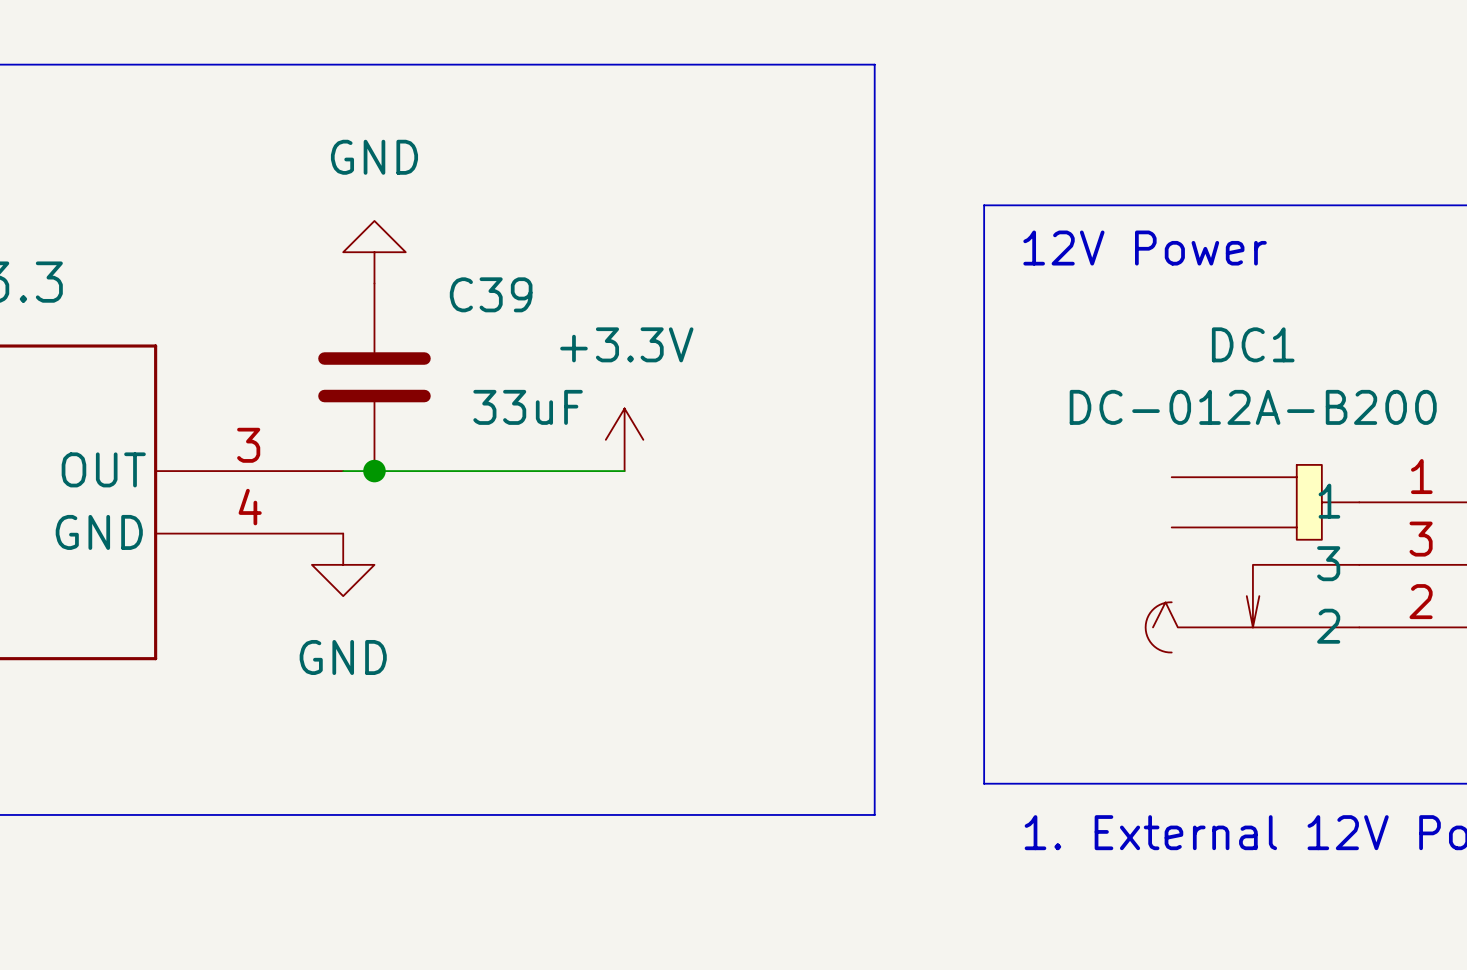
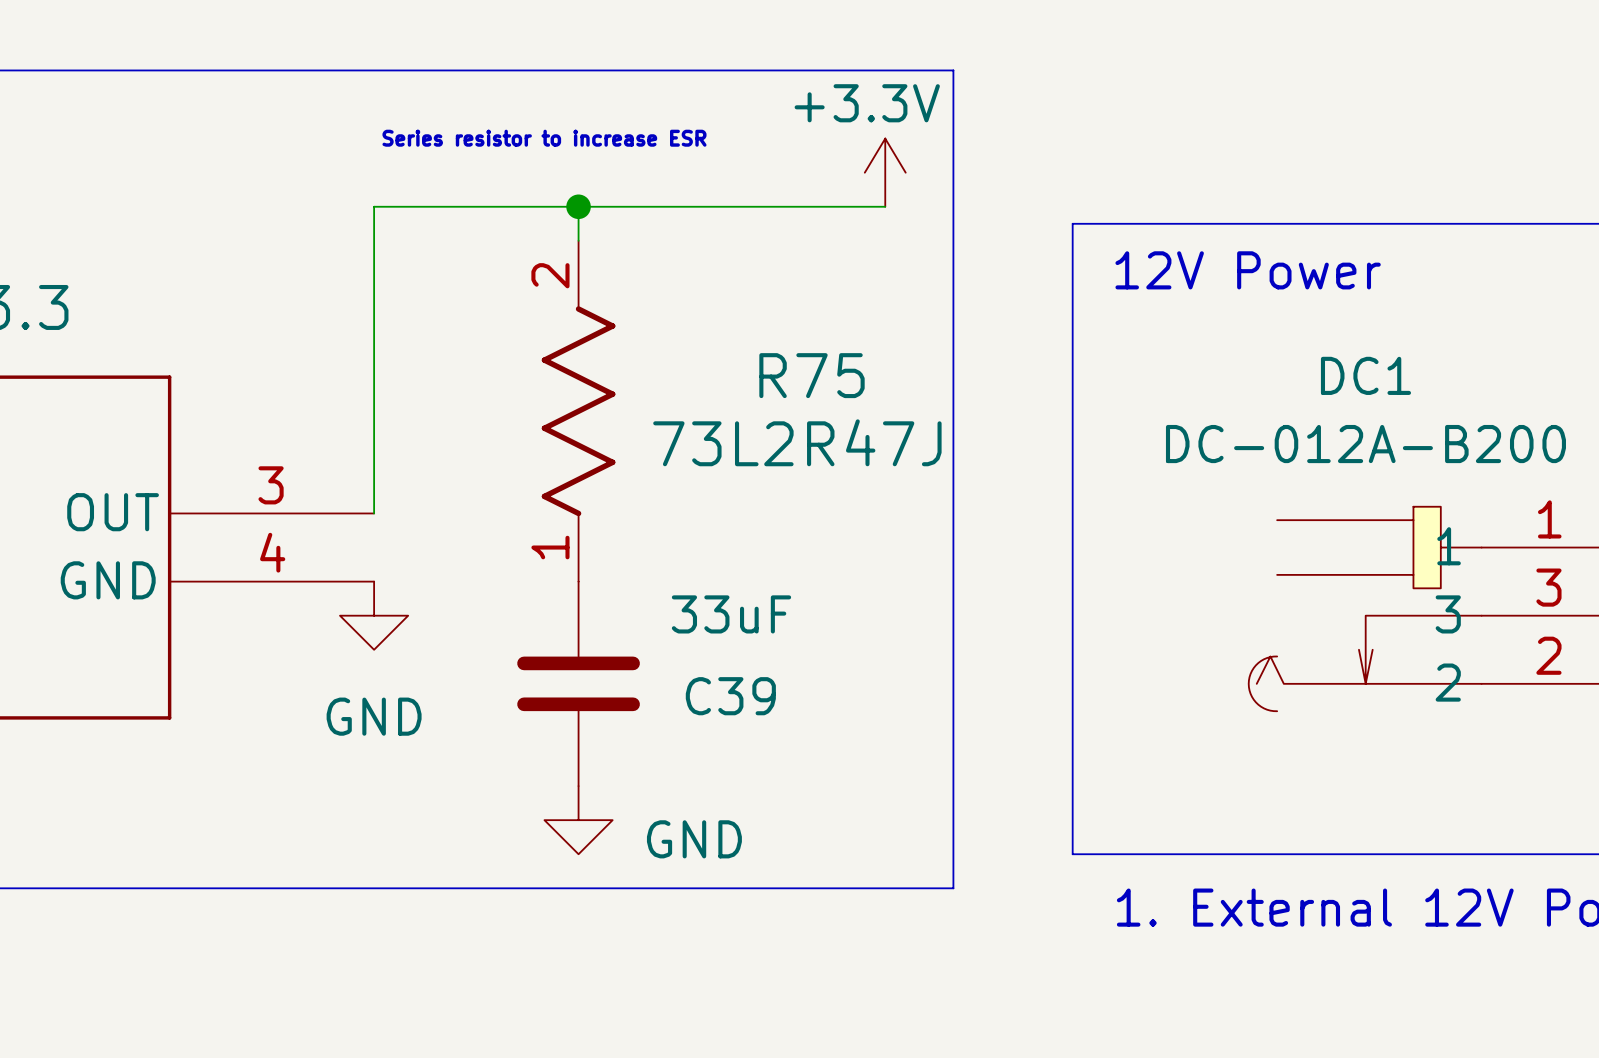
text: none -> Series resistor to increase ESR (544, 138)
power symbol text position: GND (374, 157) -> GND (694, 839)
wire: none -> (578, 206) (578, 240)
junction: none -> (578, 206)
power symbol rotation: 0° (374, 252) -> 180° (578, 820)
power symbol position: GND (374, 252) -> GND (578, 820)
C39 name position: C39 (491, 294) -> C39 (730, 696)
power symbol text position: +3.3V (626, 344) -> +3.3V (867, 103)
C39 position: (374, 377) -> (578, 683)
R75: none -> 73L2R47J (578, 411)
C39 value position: 33uF (528, 407) -> 33uF (731, 614)
power symbol position: +3.3V (624, 439) -> +3.3V (885, 172)
wire: (343, 471) (624, 471) -> (374, 513) (374, 206) (885, 206)
junction: (374, 471) -> none

